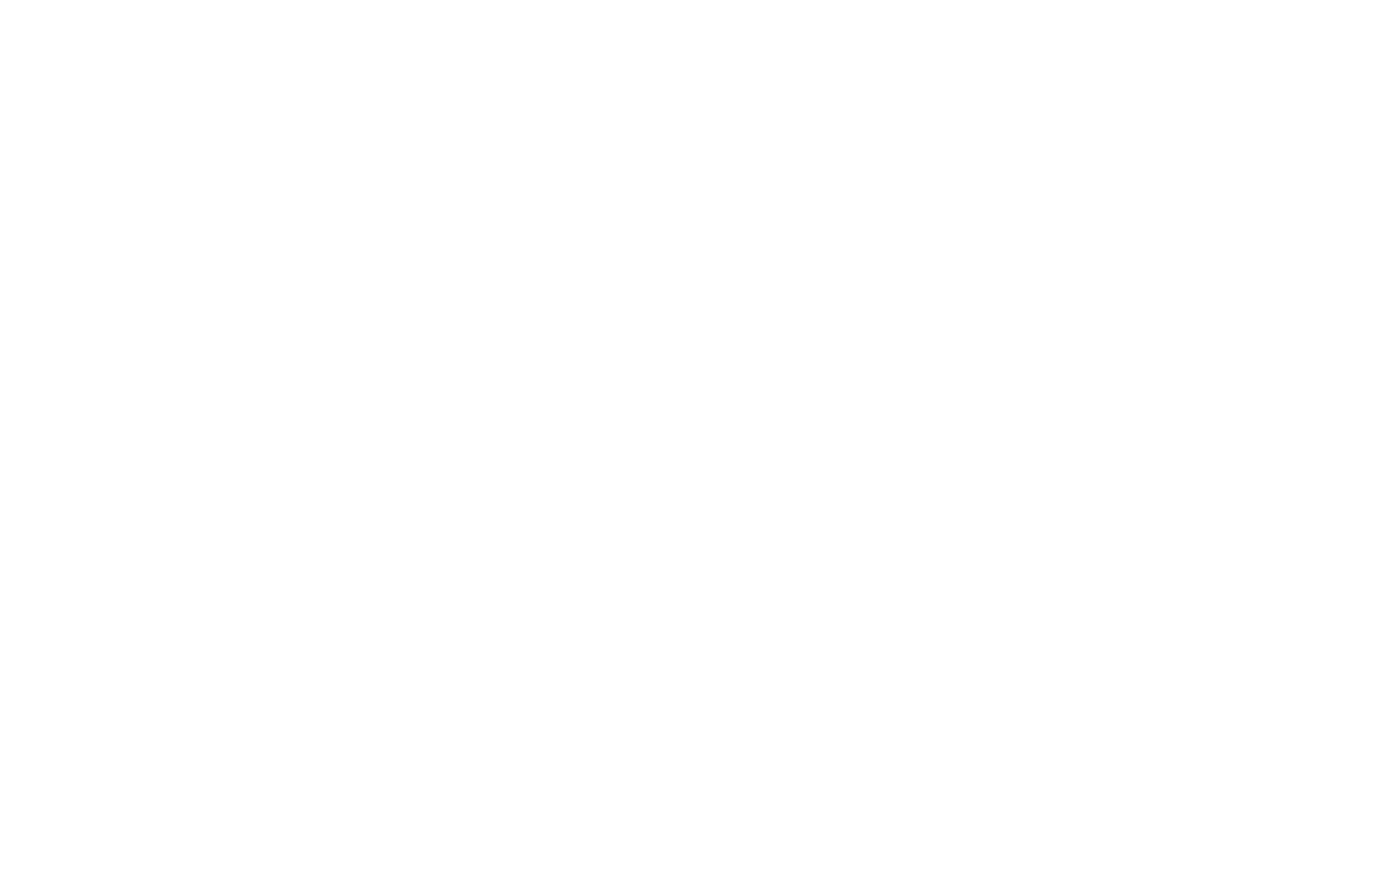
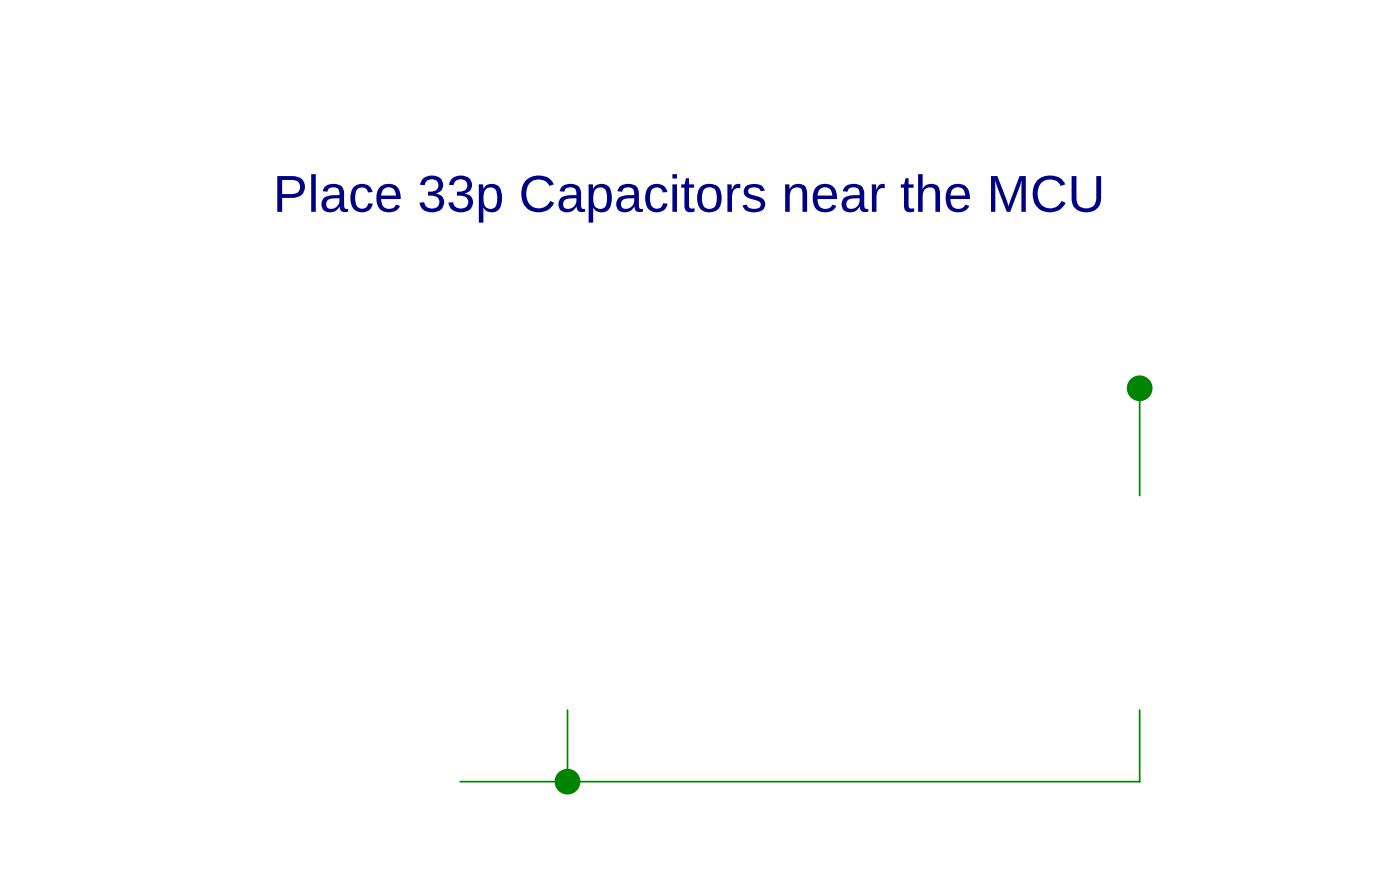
text: none -> Place 33p Capacitors near the MCU (689, 198)
wire: none -> (1139, 388) (1139, 495)
junction: none -> (1139, 388)
wire: none -> (567, 710) (567, 781)
wire: none -> (1139, 710) (1139, 781) (460, 781)
junction: none -> (567, 781)

